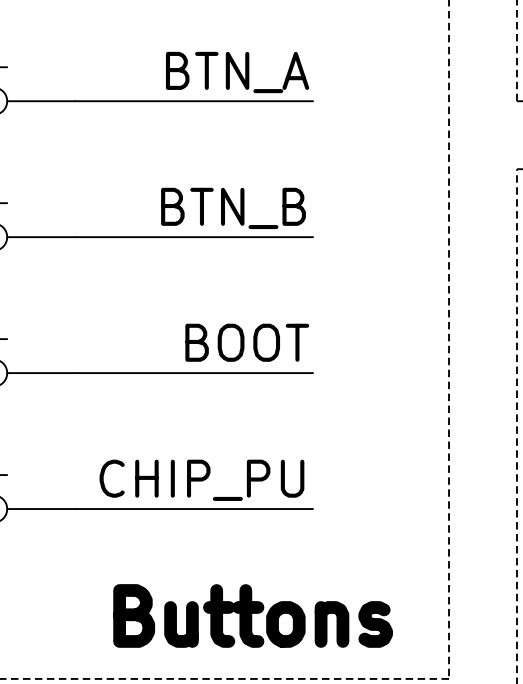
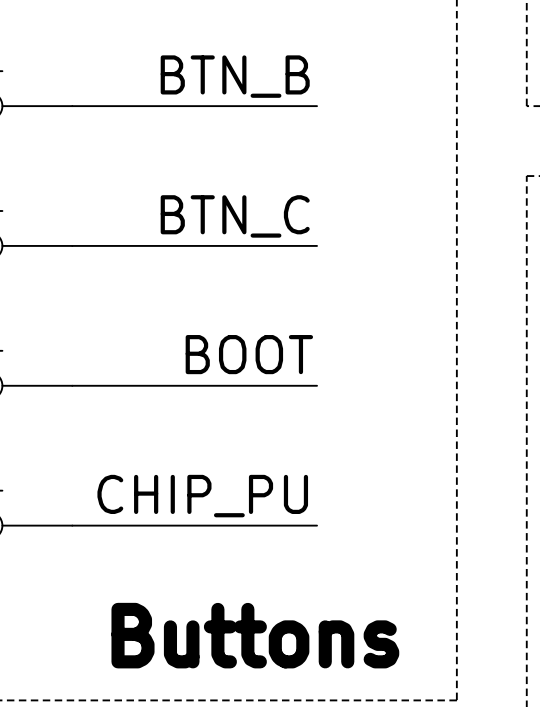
label: BTN_A (237, 72) -> BTN_B (235, 76)
label: BTN_B (233, 208) -> BTN_C (235, 216)

